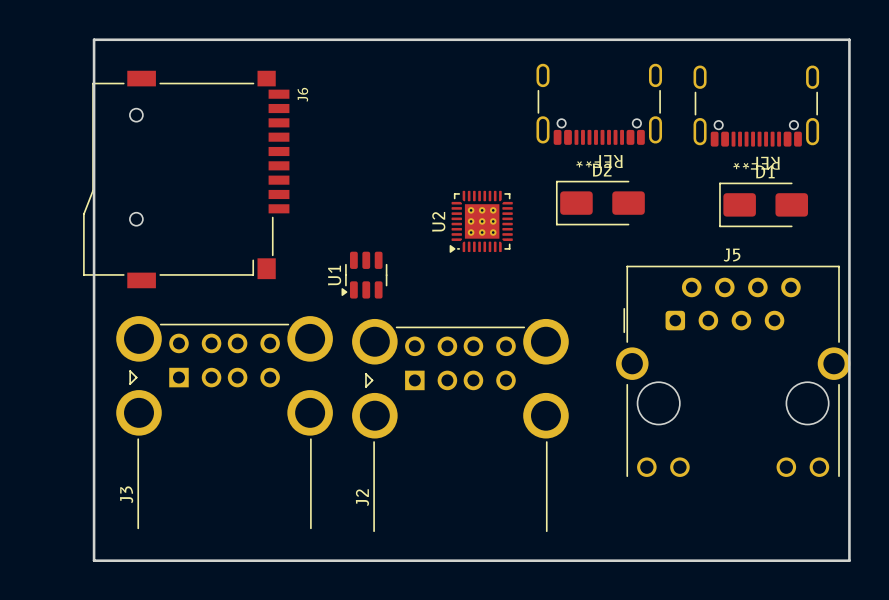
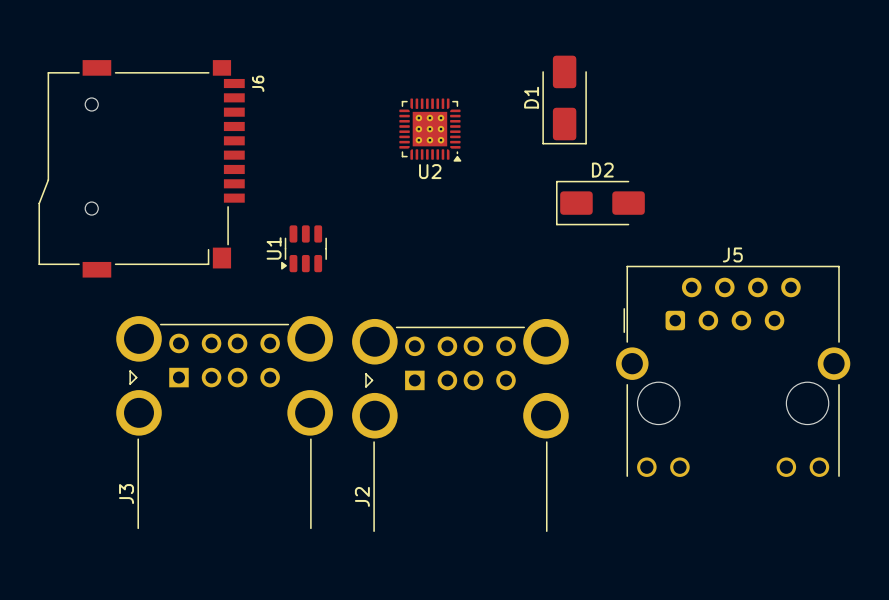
board edge: (94, 39) (849, 39) (849, 560) (94, 560) (94, 39) -> none
REF**: (599, 104) -> none
REF**: (756, 106) -> none
J6 position: (186, 179) -> (141, 168)
D1 rotation: 0° (763, 204) -> 90° counterclockwise (564, 100)
D1 position: (763, 204) -> (564, 100)
U2 rotation: 0° (481, 221) -> 90° counterclockwise (430, 130)
U2 position: (481, 221) -> (430, 130)
U1 position: (364, 275) -> (304, 248)

